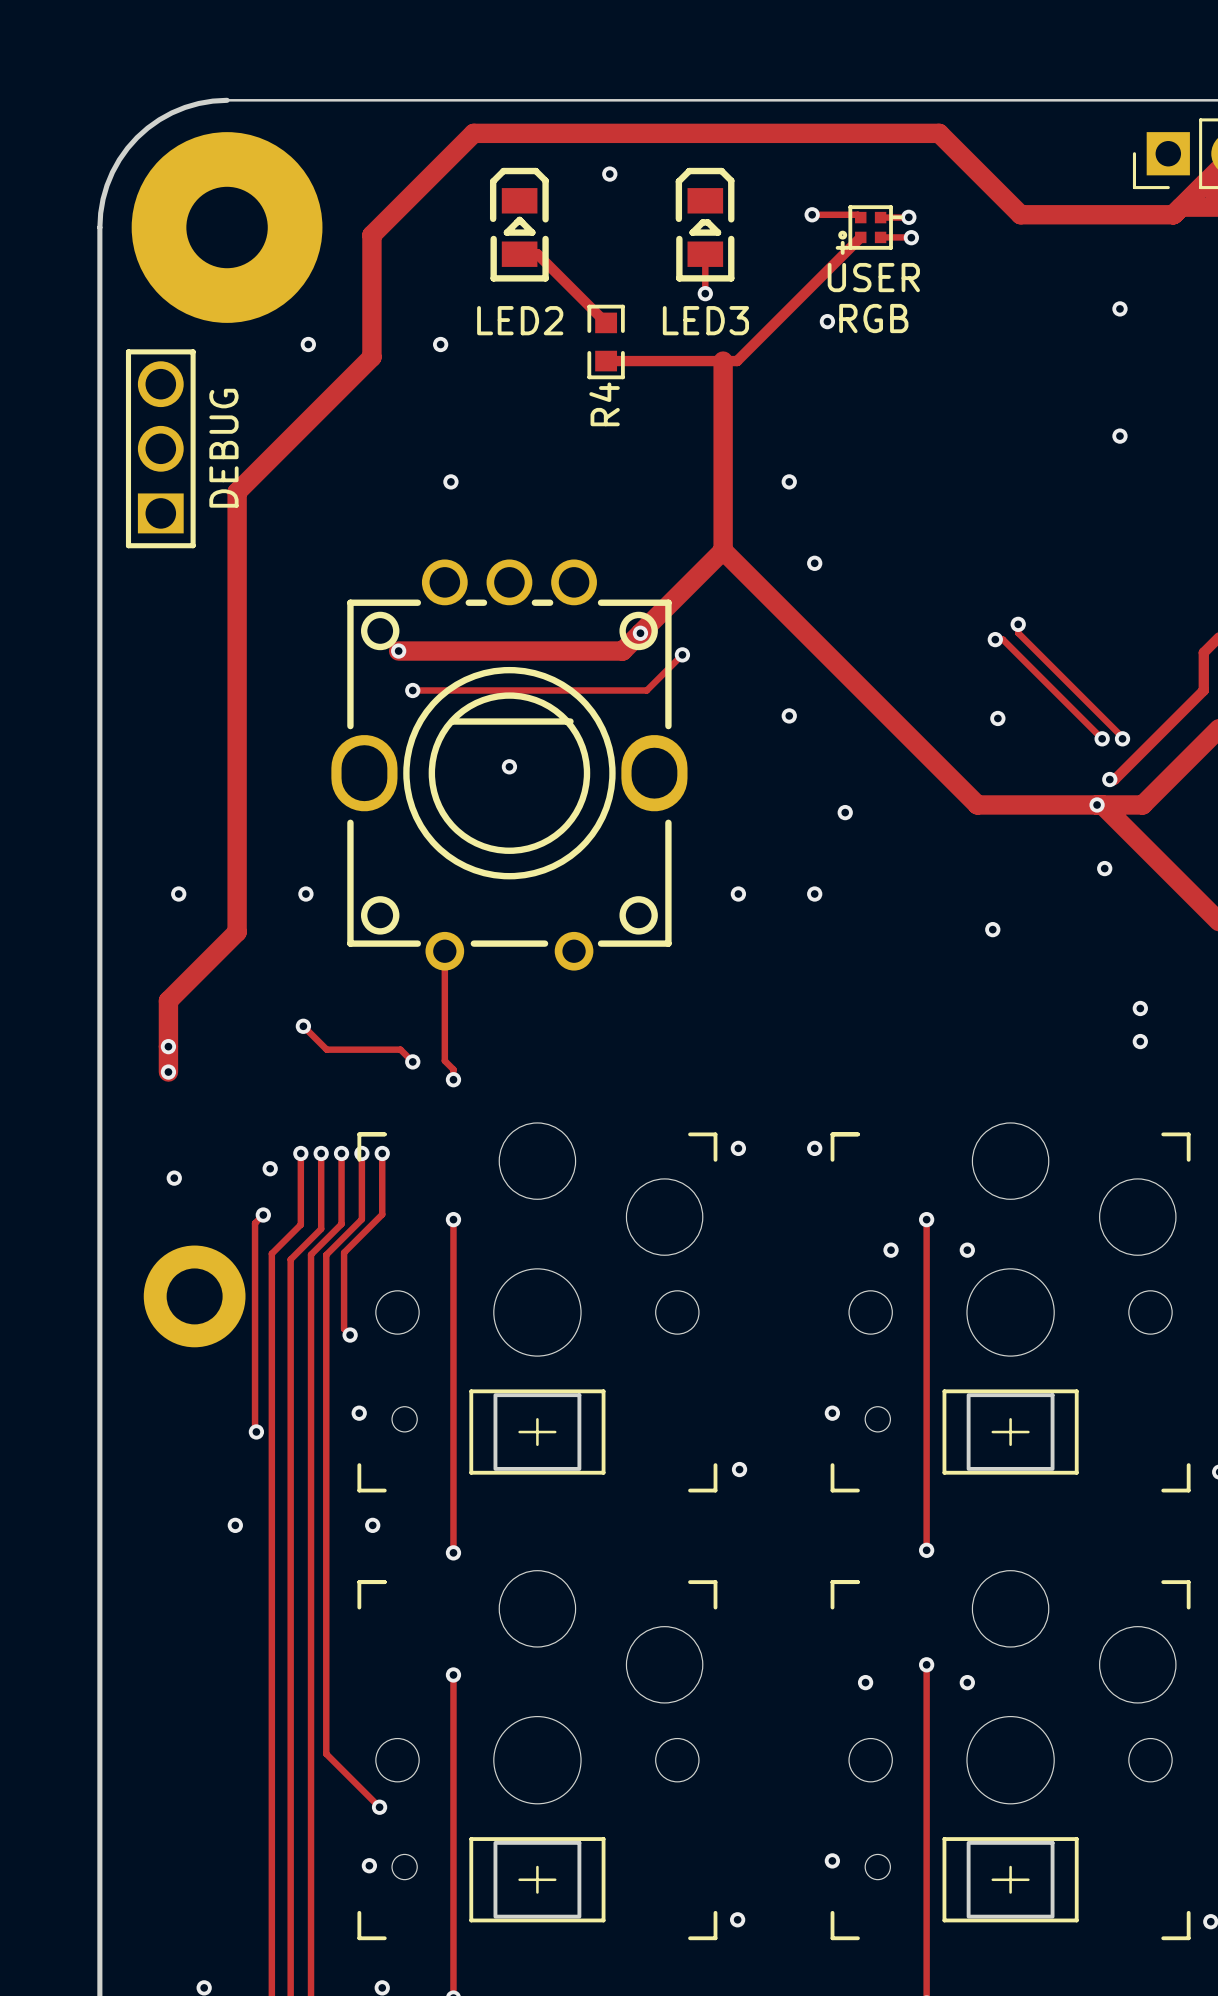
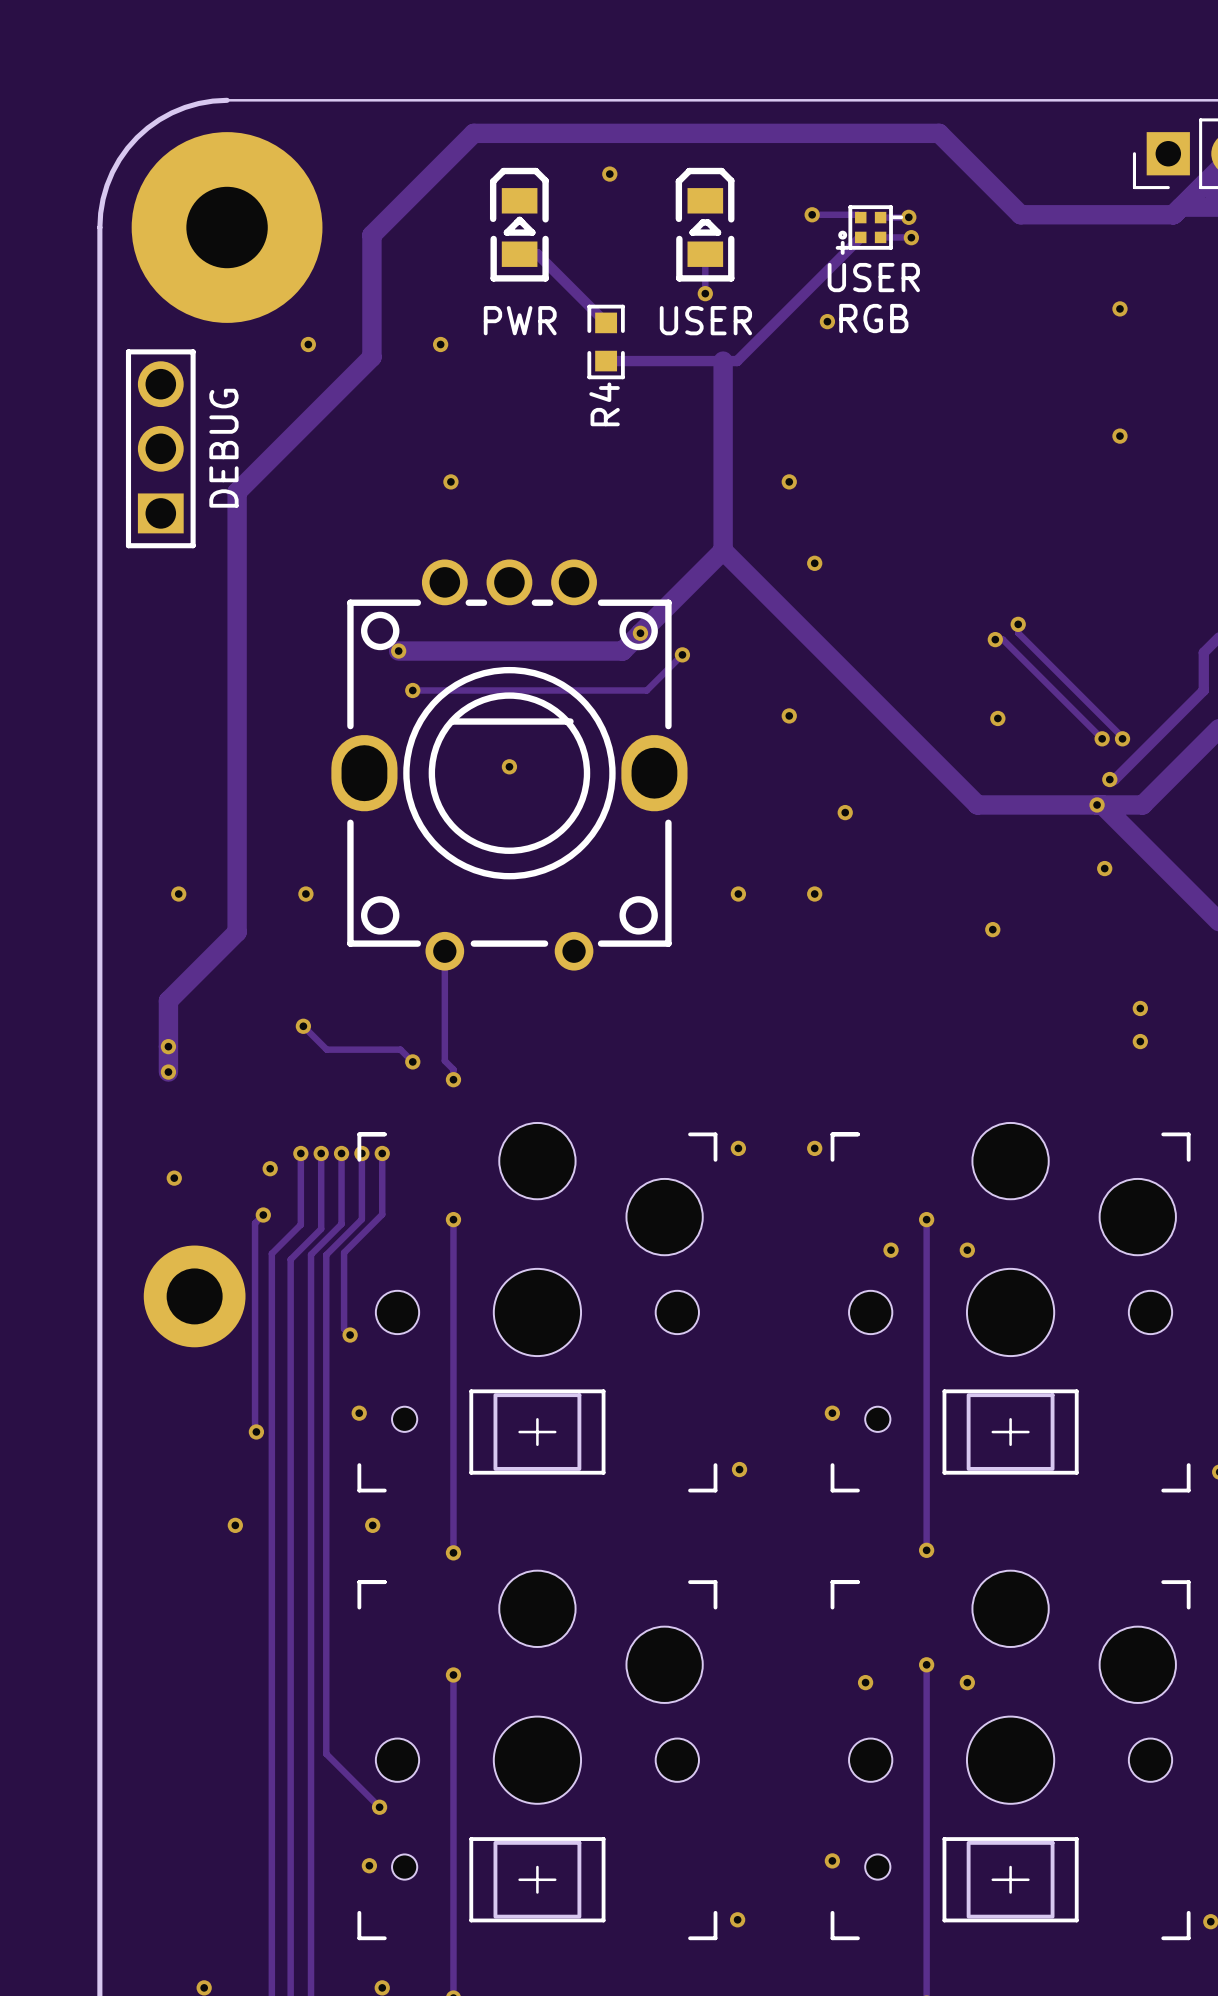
LED2 name: LED2 (520, 320) -> PWR (520, 320)
LED3 name: LED3 (705, 320) -> USER (705, 320)

